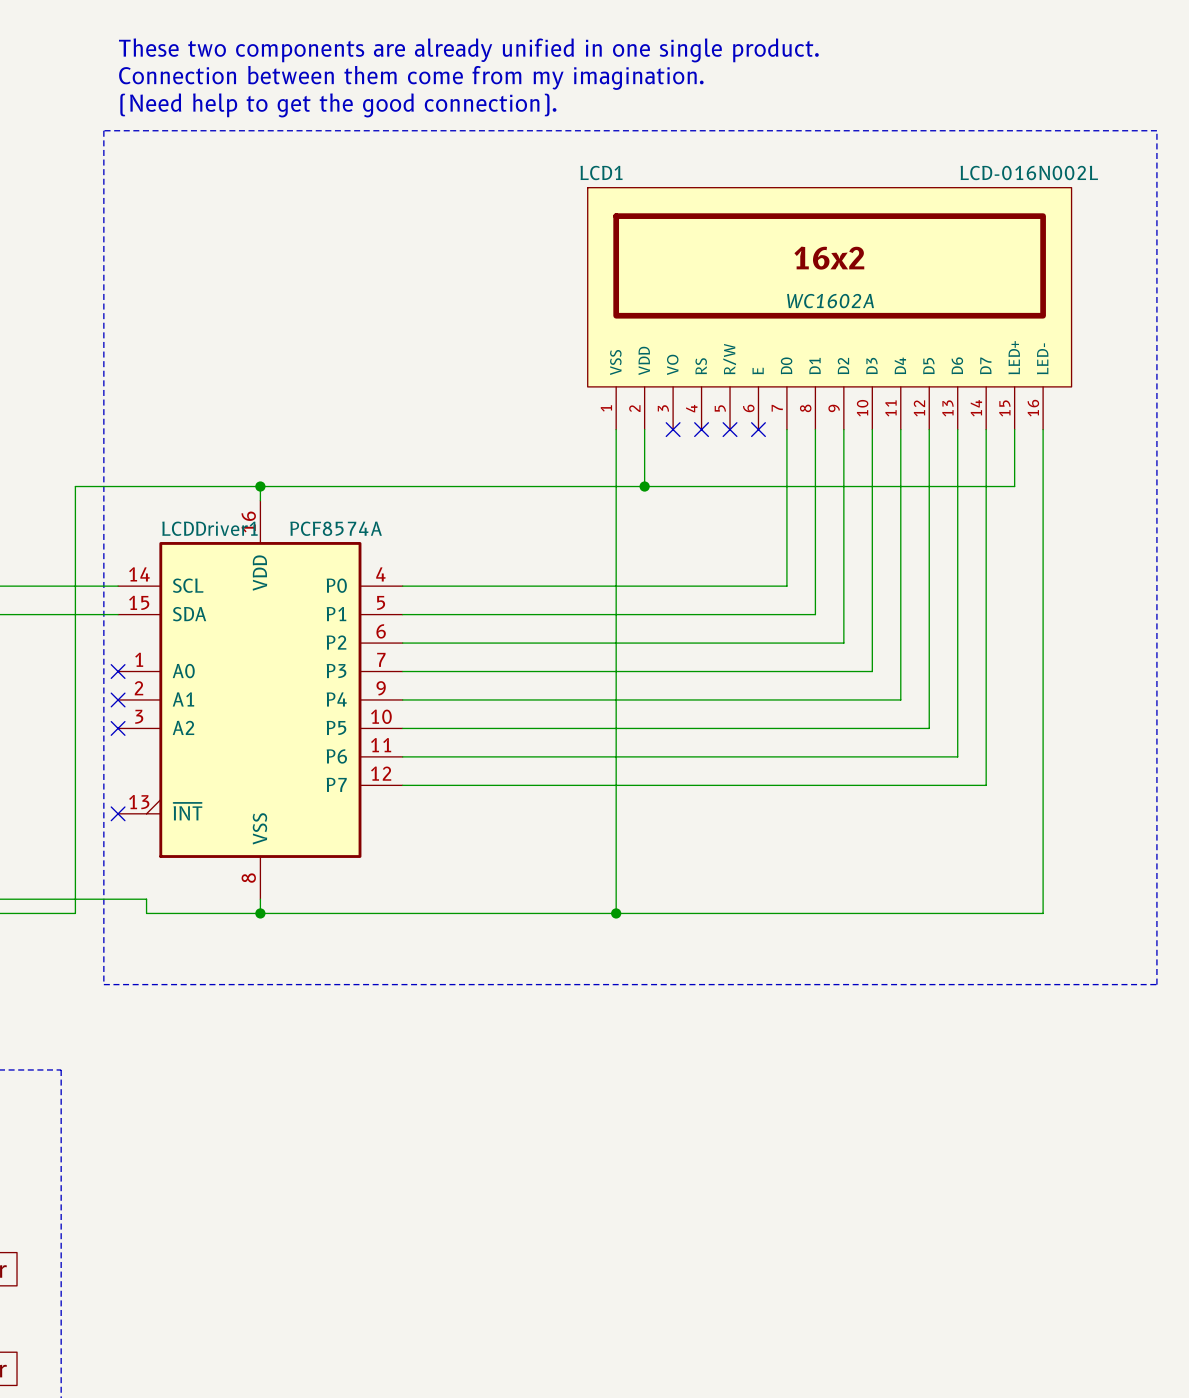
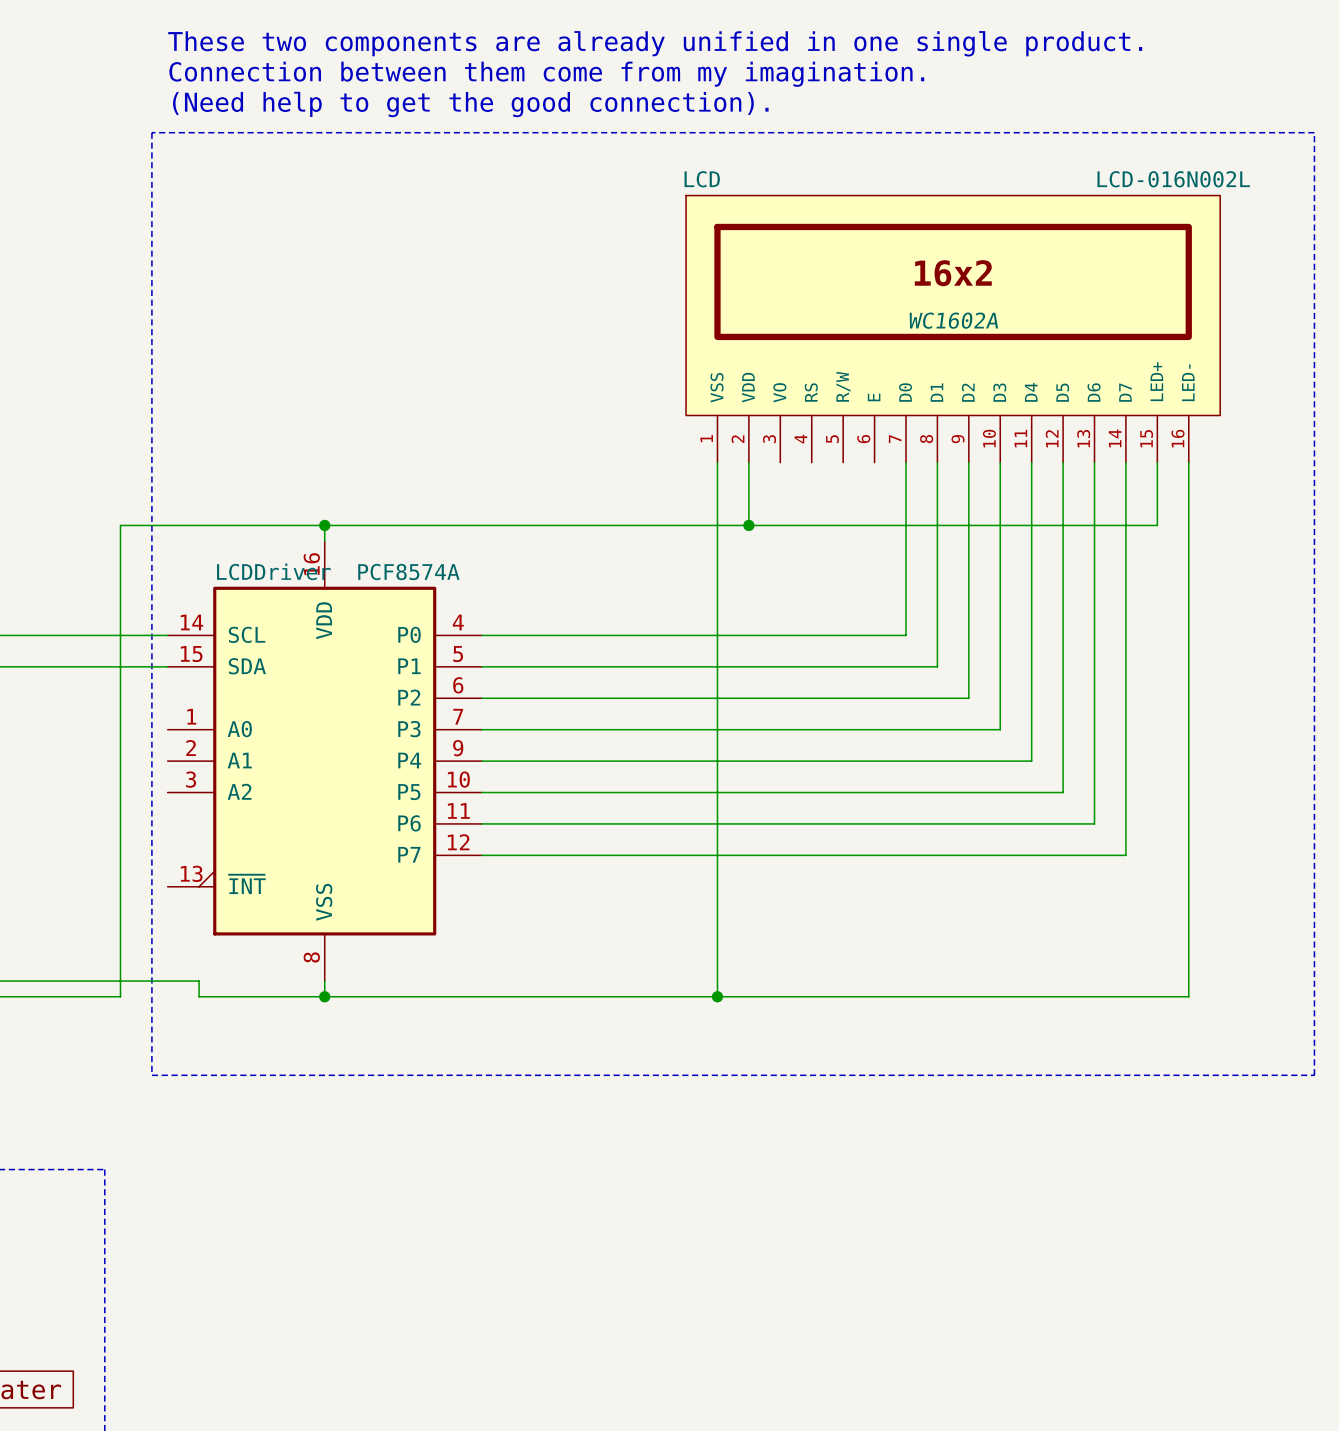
LCD1 name: LCD1 (601, 172) -> LCD (702, 179)
no-connect mark: (673, 429) -> none
no-connect mark: (701, 429) -> none
no-connect mark: (730, 429) -> none
no-connect mark: (758, 429) -> none
LCDDriver1 name: LCDDriver1 (209, 528) -> LCDDriver (273, 571)
no-connect mark: (118, 671) -> none
no-connect mark: (118, 699) -> none
no-connect mark: (118, 728) -> none
no-connect mark: (118, 813) -> none

